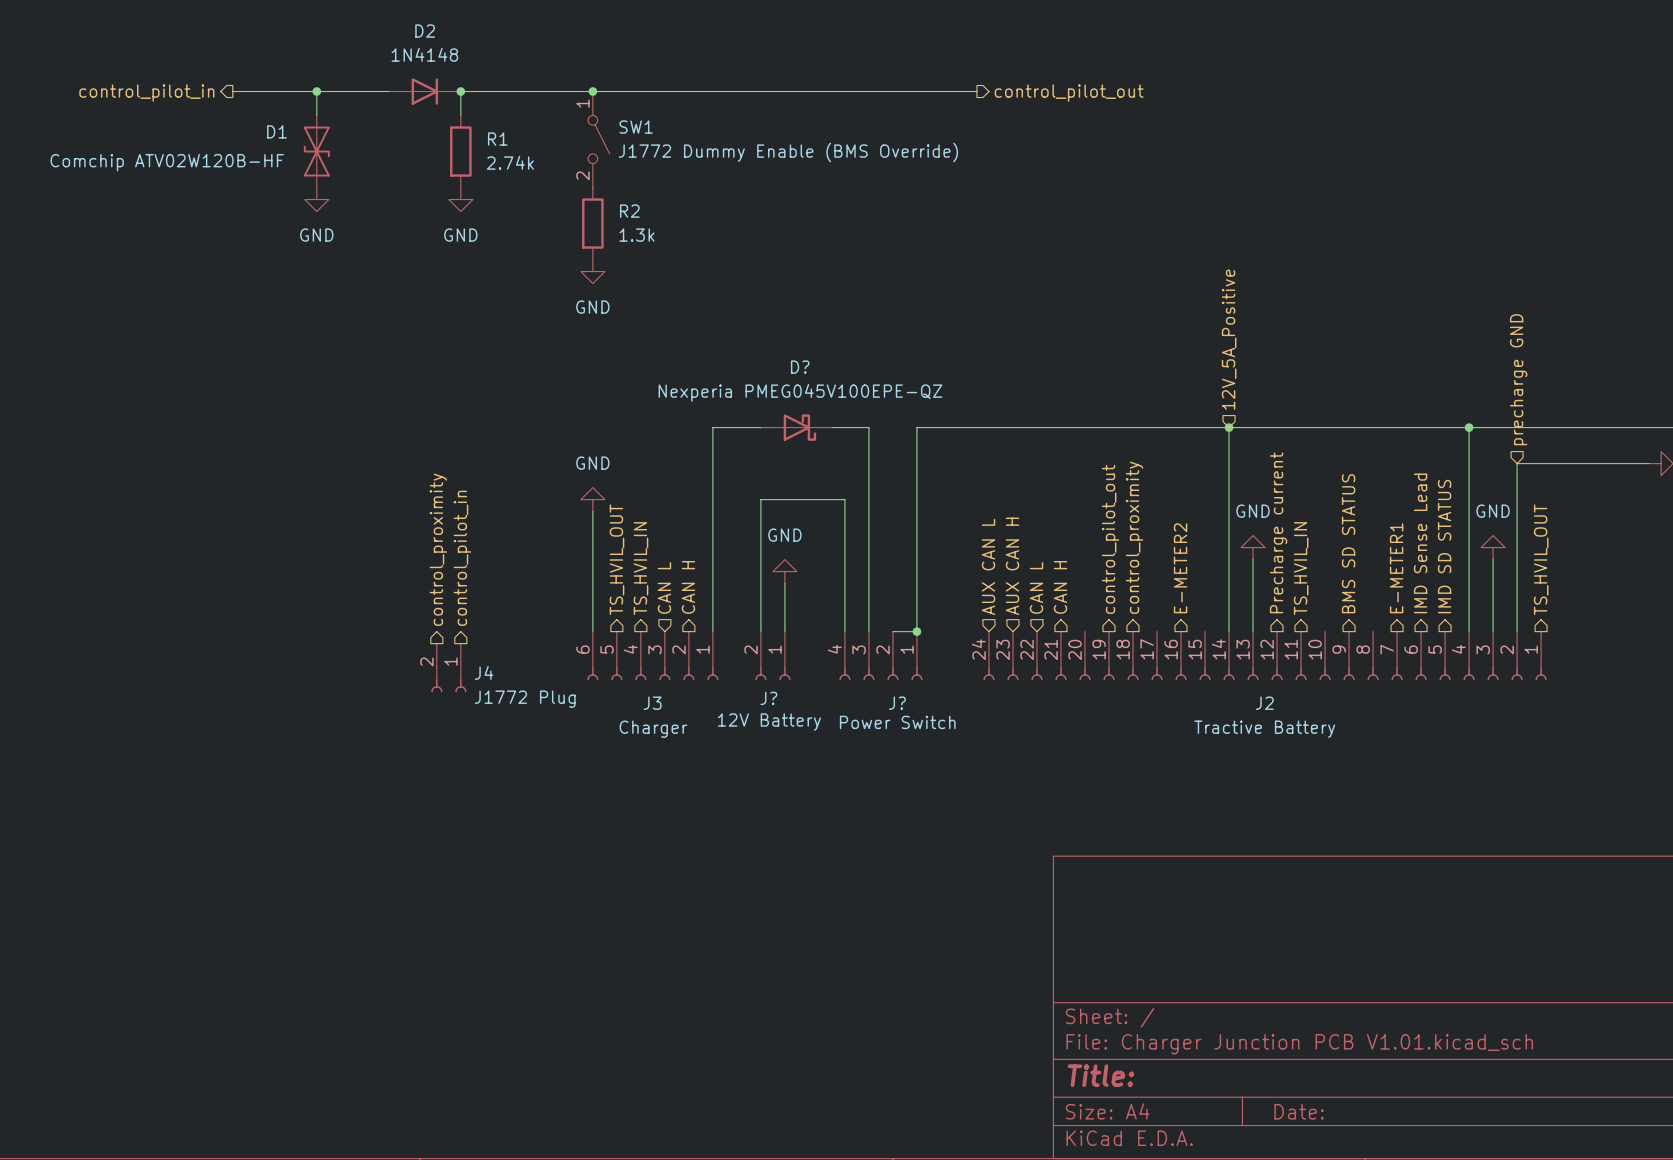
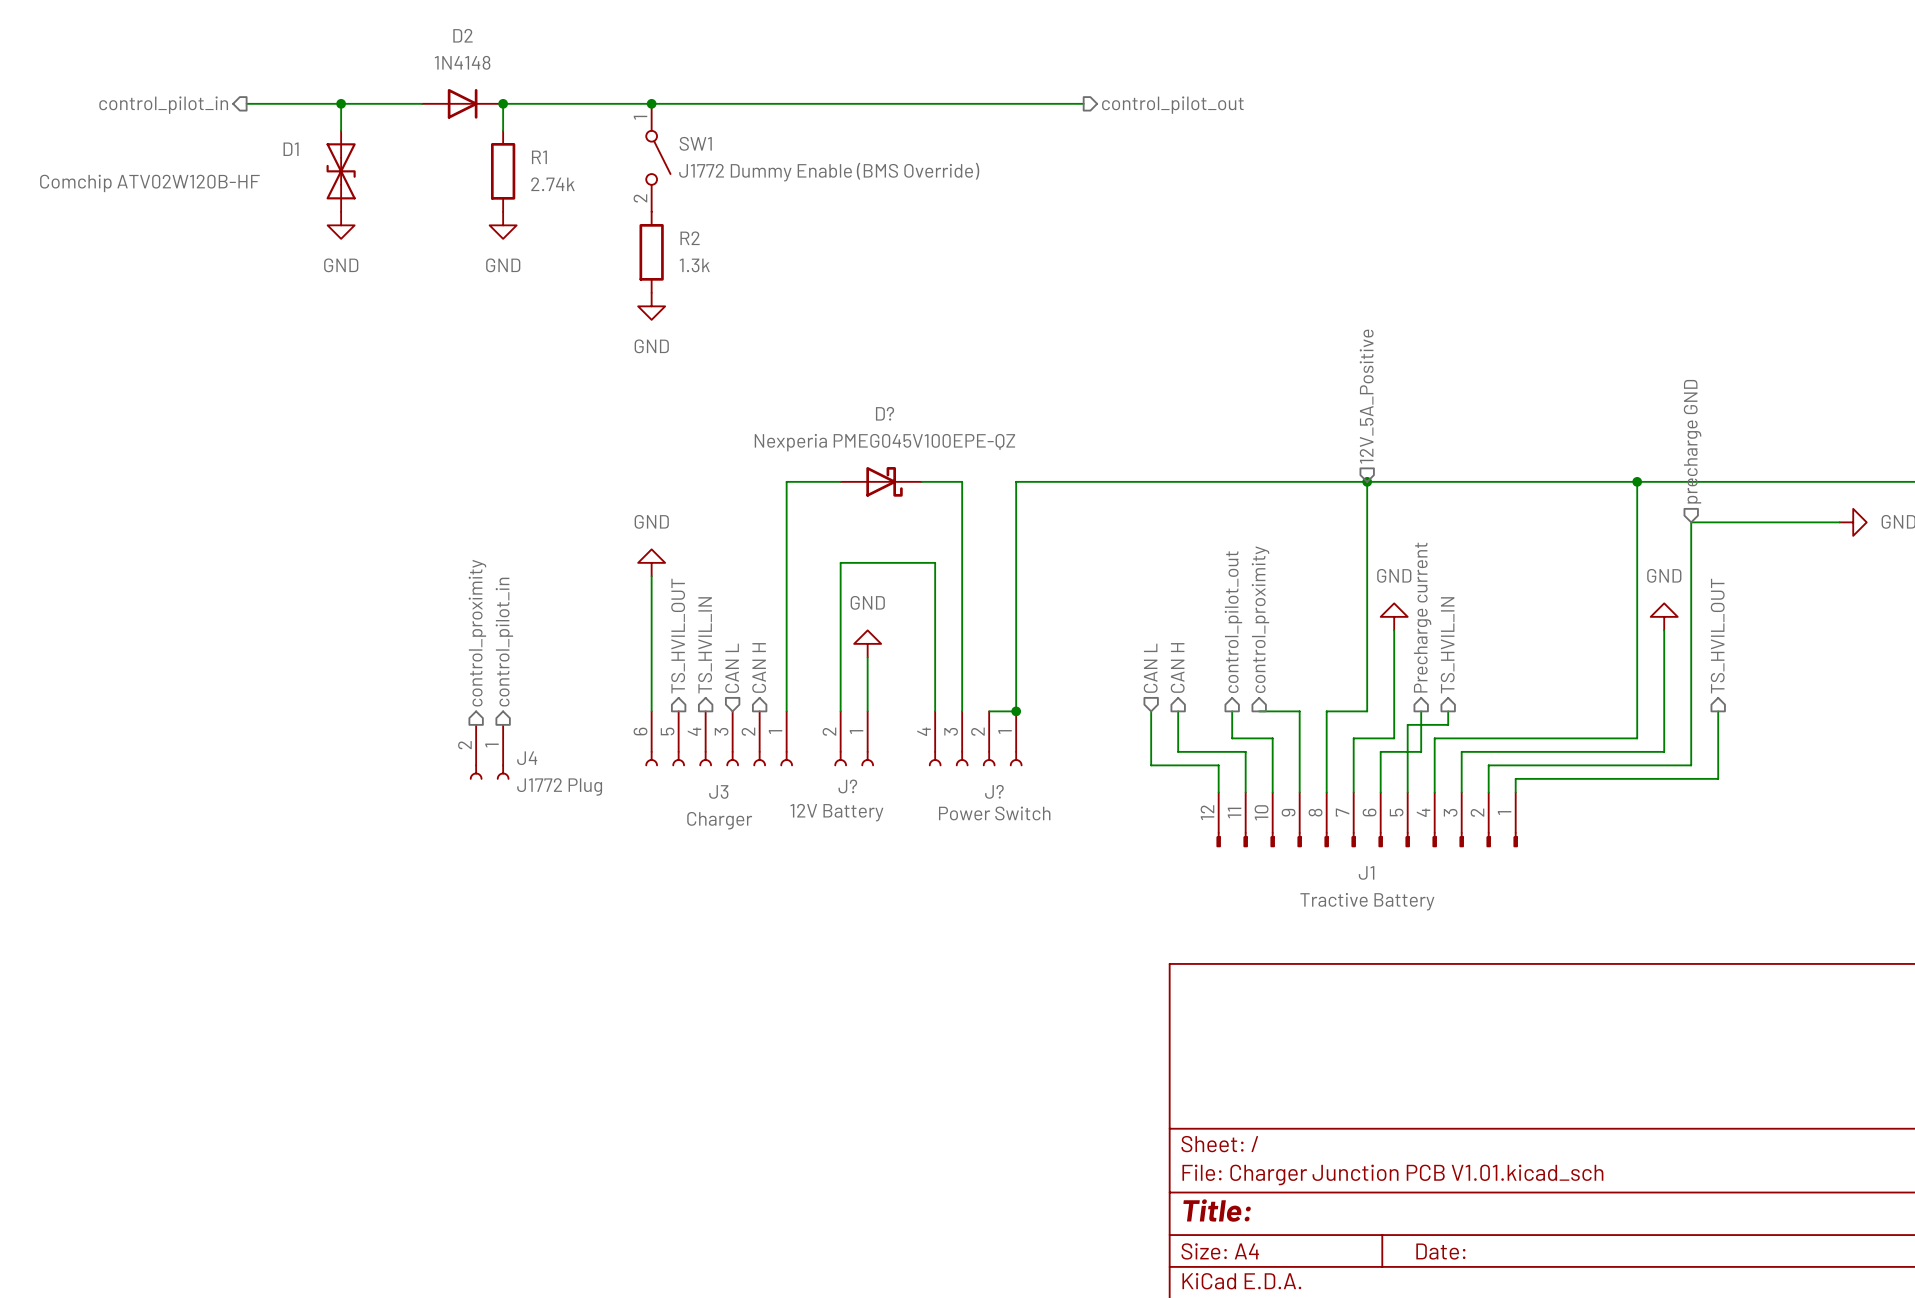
hierarchical label: BMS SD STATUS (1348, 543) -> none
hierarchical label: IMD Sense Lead (1420, 543) -> none
hierarchical label: IMD SD STATUS (1444, 546) -> none
hierarchical label: AUX CAN L (988, 566) -> none
hierarchical label: AUX CAN H (1012, 566) -> none
hierarchical label: E-METER2 (1180, 568) -> none
hierarchical label: E-METER1 (1396, 568) -> none
wire: none -> (1151, 711) (1151, 765) (1218, 765) (1218, 792)
wire: none -> (1178, 711) (1178, 751) (1245, 751) (1245, 792)
wire: none -> (1232, 711) (1232, 738) (1272, 738) (1272, 792)
wire: none -> (1259, 711) (1299, 711) (1299, 792)
wire: none -> (1367, 711) (1326, 711) (1326, 792)
wire: none -> (1394, 711) (1394, 738) (1353, 738) (1353, 792)
wire: none -> (1421, 711) (1421, 751) (1380, 751) (1380, 792)
wire: none -> (1448, 711) (1448, 724) (1407, 724) (1407, 792)
wire: none -> (1637, 711) (1637, 738) (1434, 738) (1434, 792)
wire: none -> (1664, 711) (1664, 751) (1461, 751) (1461, 792)
wire: none -> (1691, 711) (1691, 765) (1488, 765) (1488, 792)
wire: none -> (1718, 711) (1718, 778) (1515, 778) (1515, 792)
J2: Tractive Battery (1265, 656) -> none
J1: none -> Tractive Battery (1367, 819)

